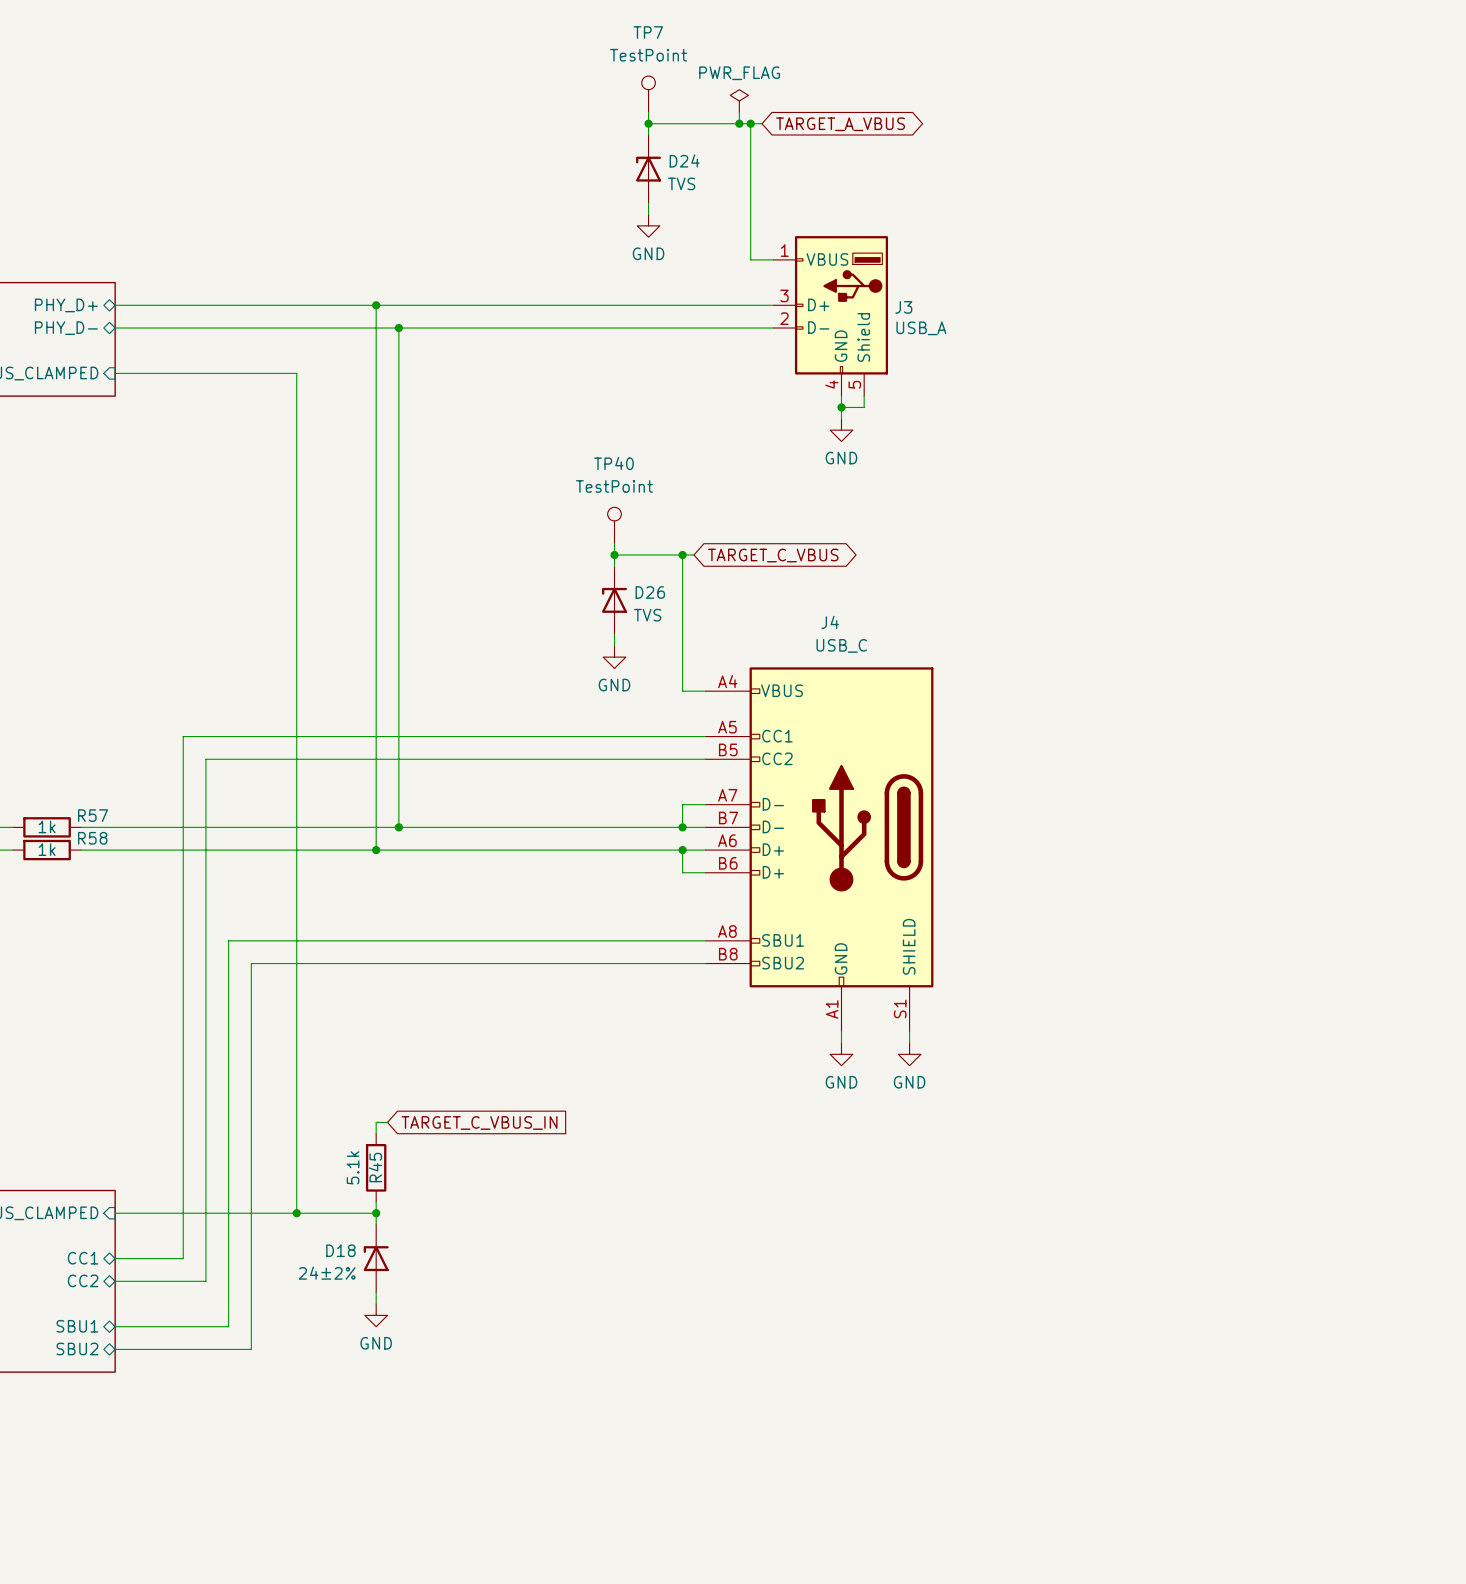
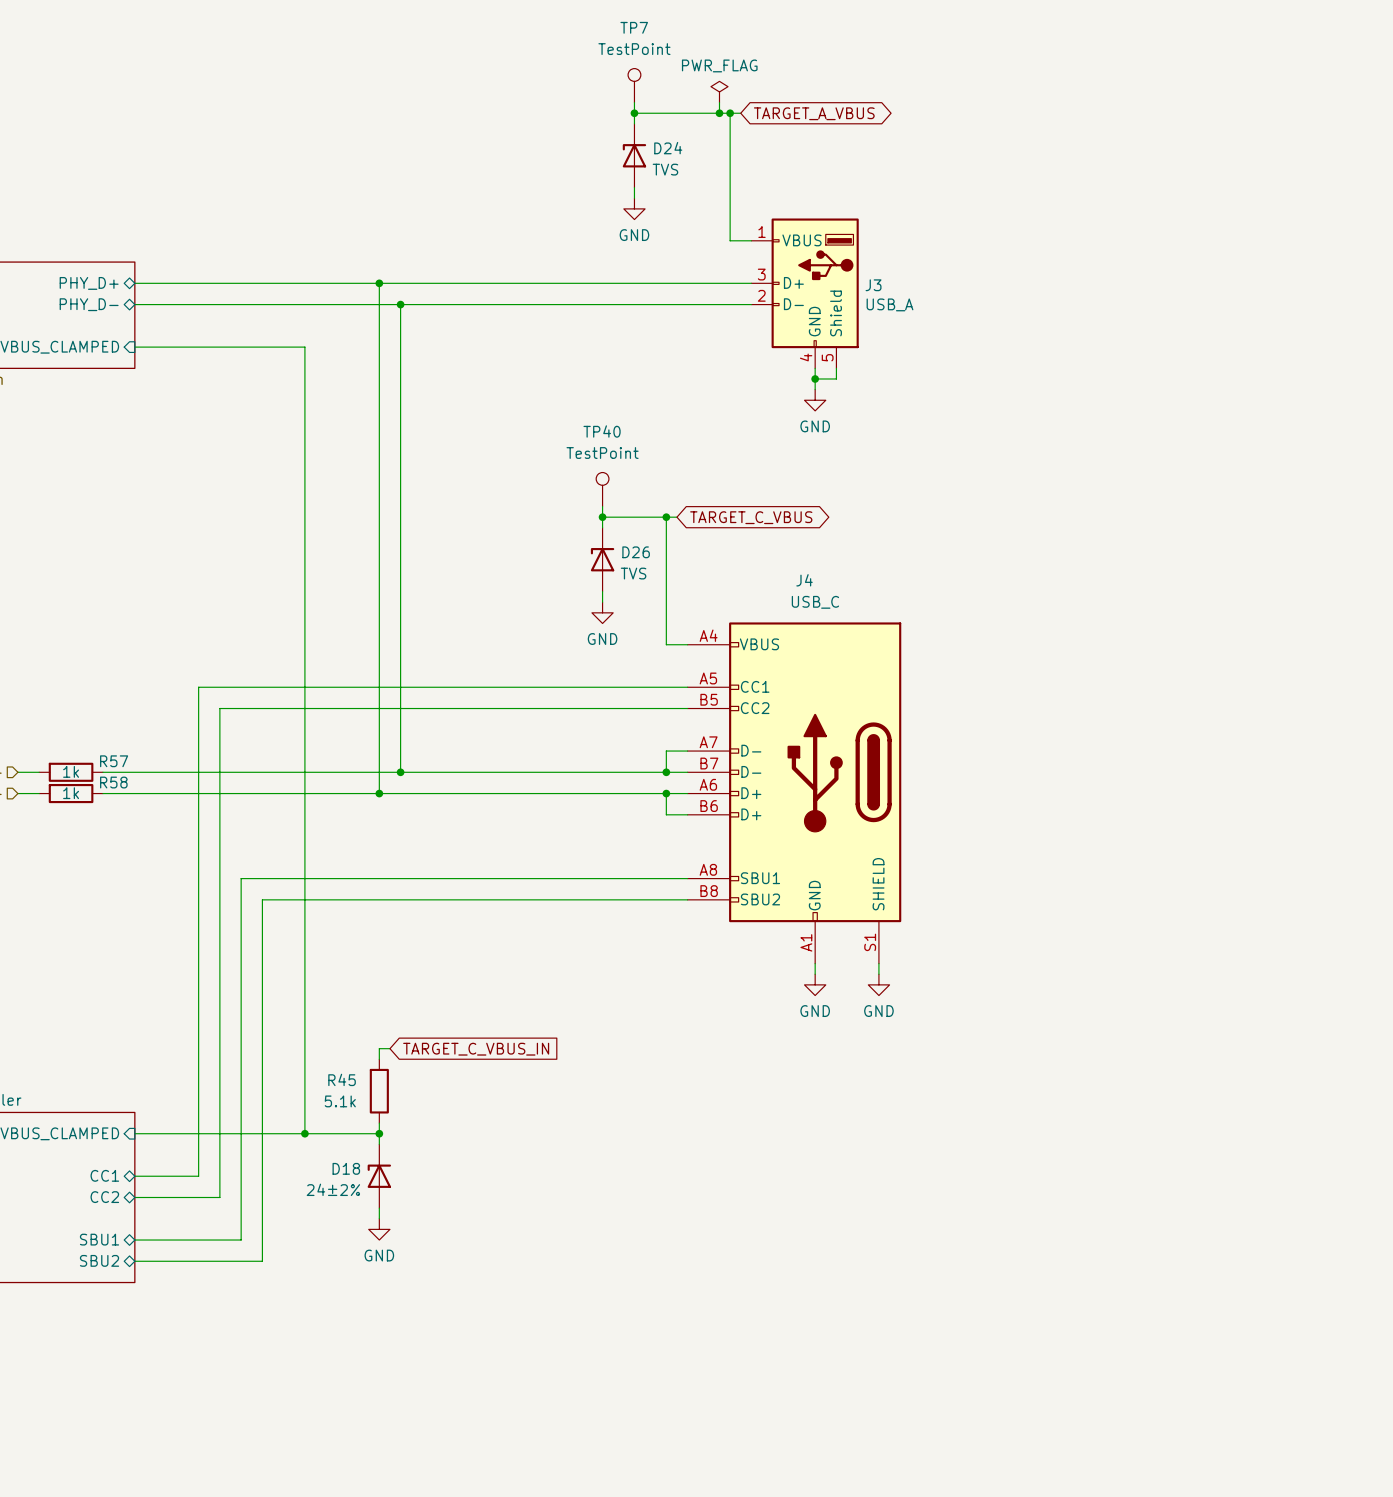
R45 value rotation: 0° (353, 1167) -> 90° clockwise (340, 1101)
R45 name rotation: 0° (375, 1167) -> 90° clockwise (342, 1079)
R45 name position: R45 (375, 1167) -> R45 (342, 1079)

